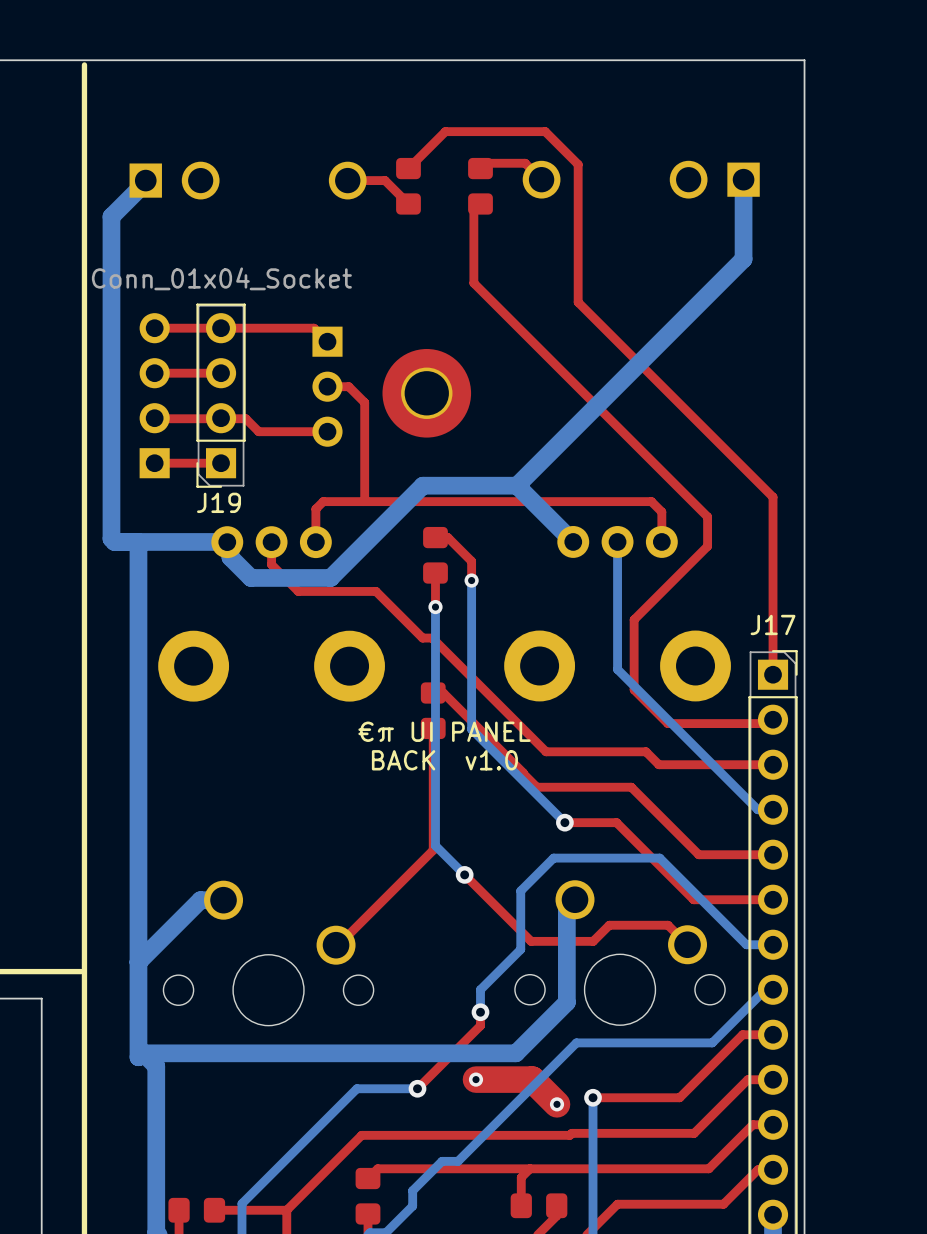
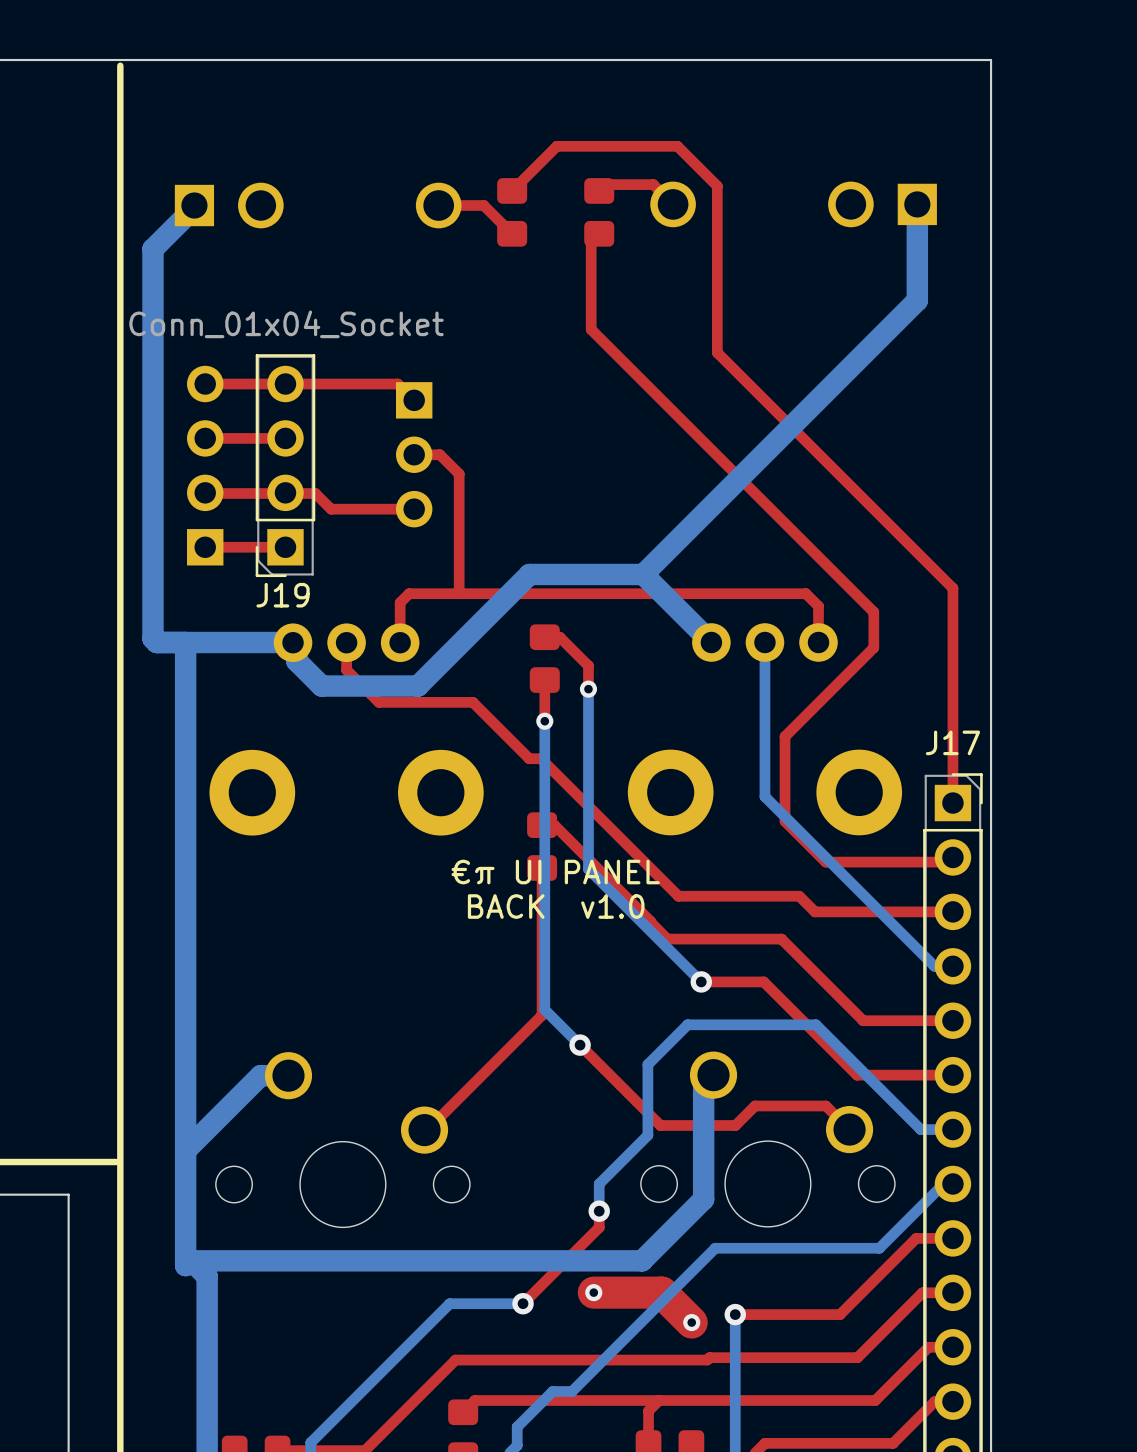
part: (426, 393) -> none

